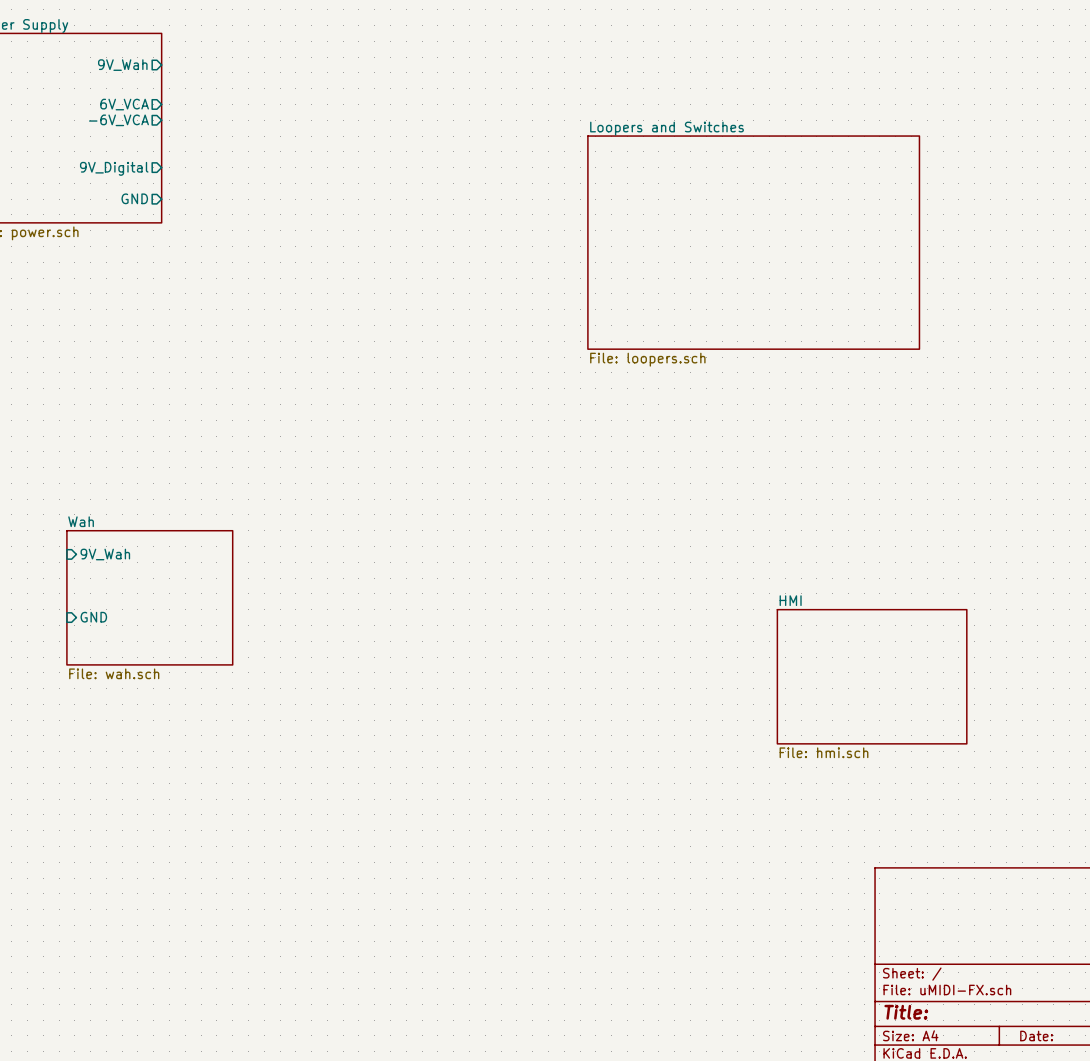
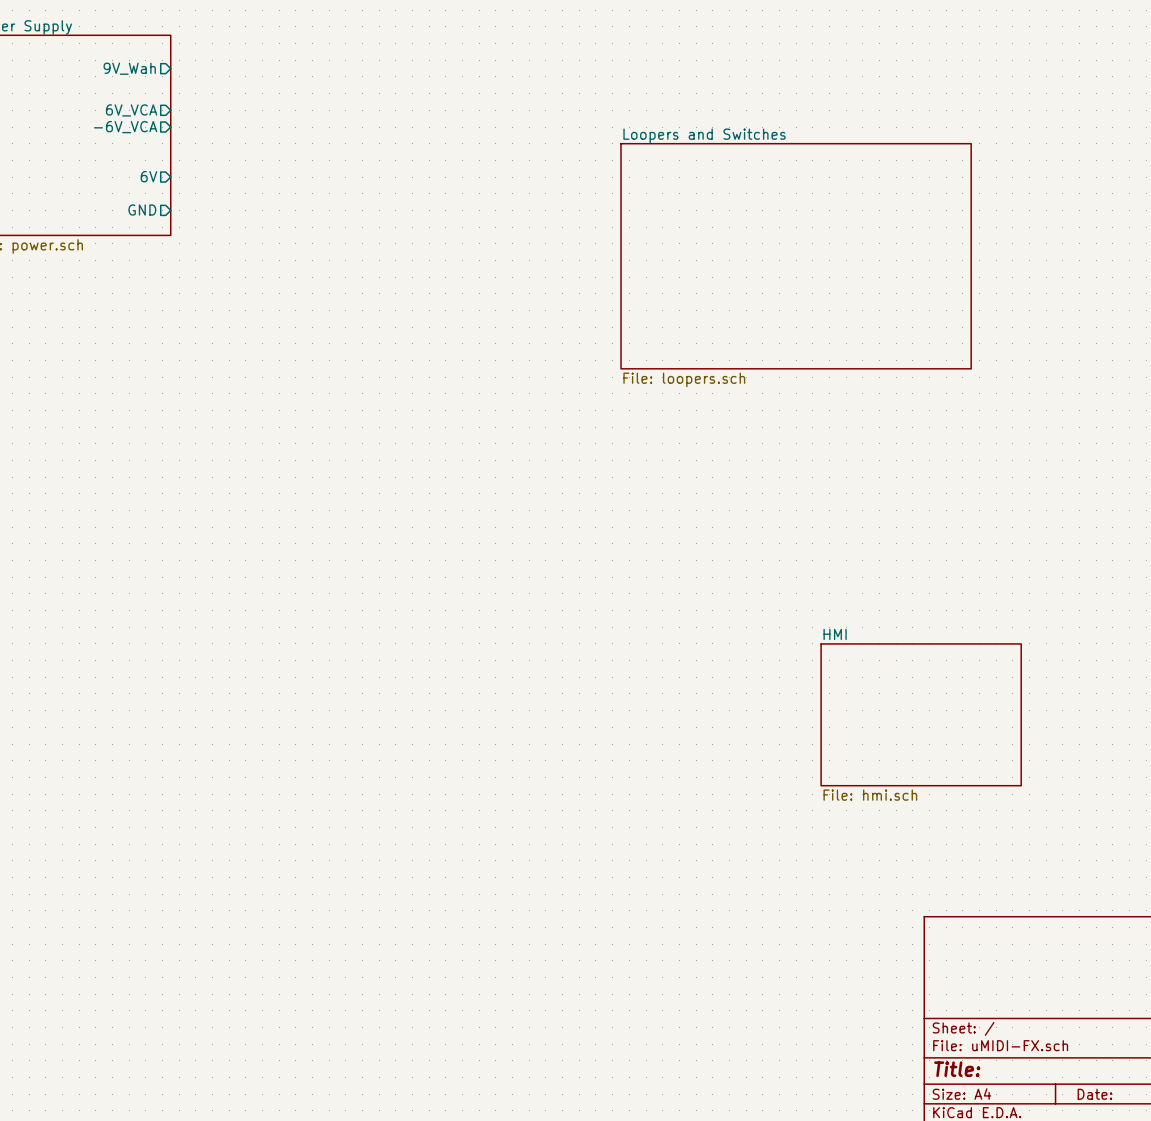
sheet pin: 9V_Digital (114, 168) -> 6V (149, 176)
sheet pin: 9V_Wah (105, 554) -> none
sheet Wah: File: wah.sch (149, 597) -> none
sheet pin: GND (93, 617) -> none

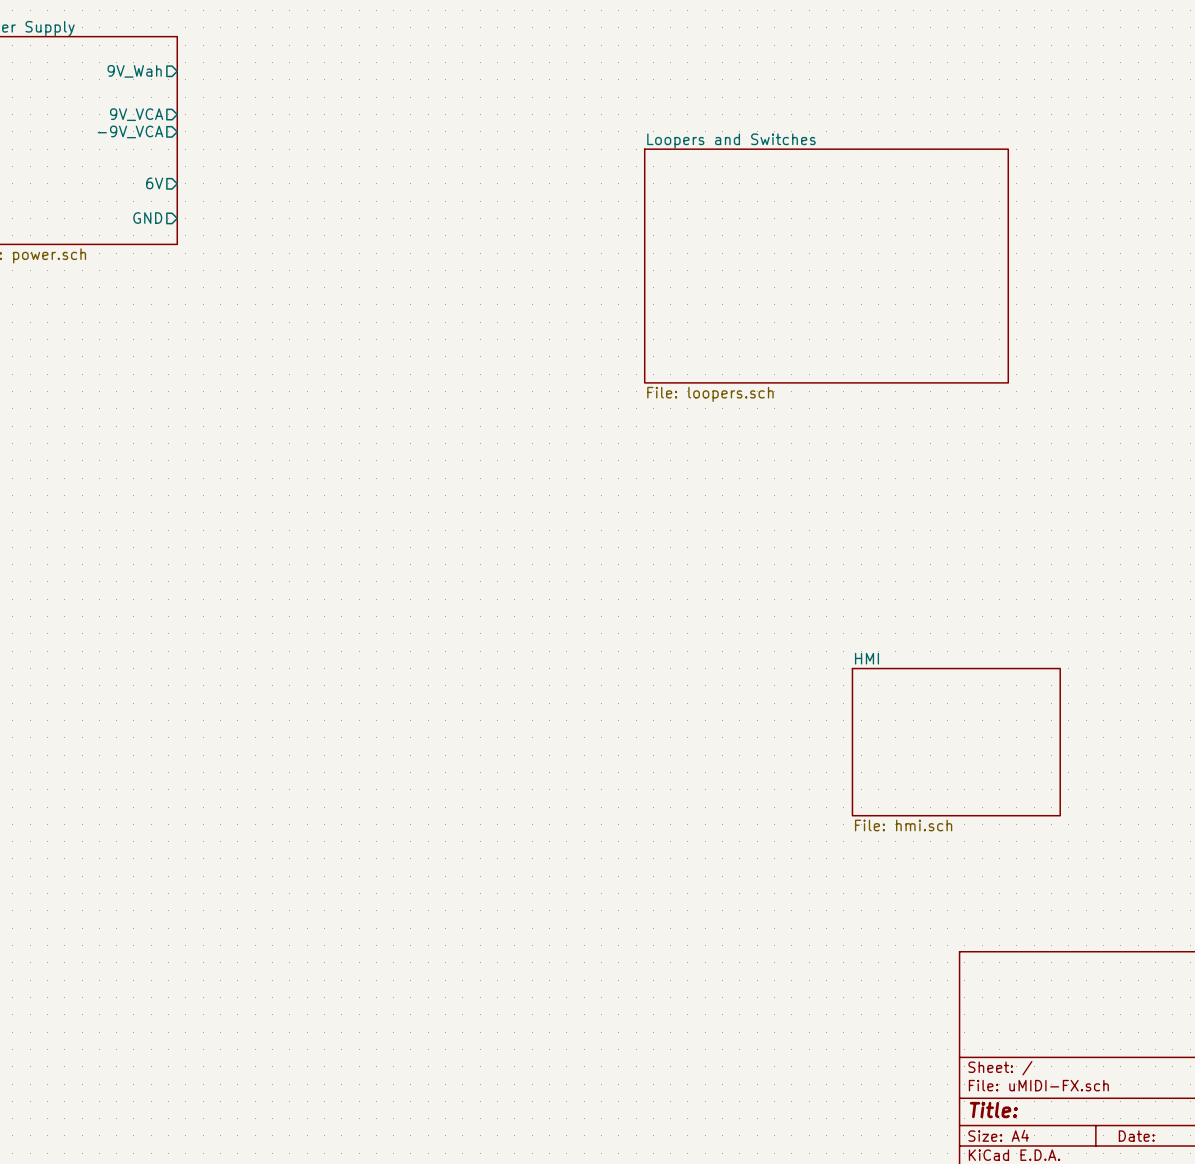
sheet pin: 6V_VCA (131, 110) -> 9V_VCA (136, 114)
sheet pin: -6V_VCA (125, 127) -> -9V_VCA (130, 131)

